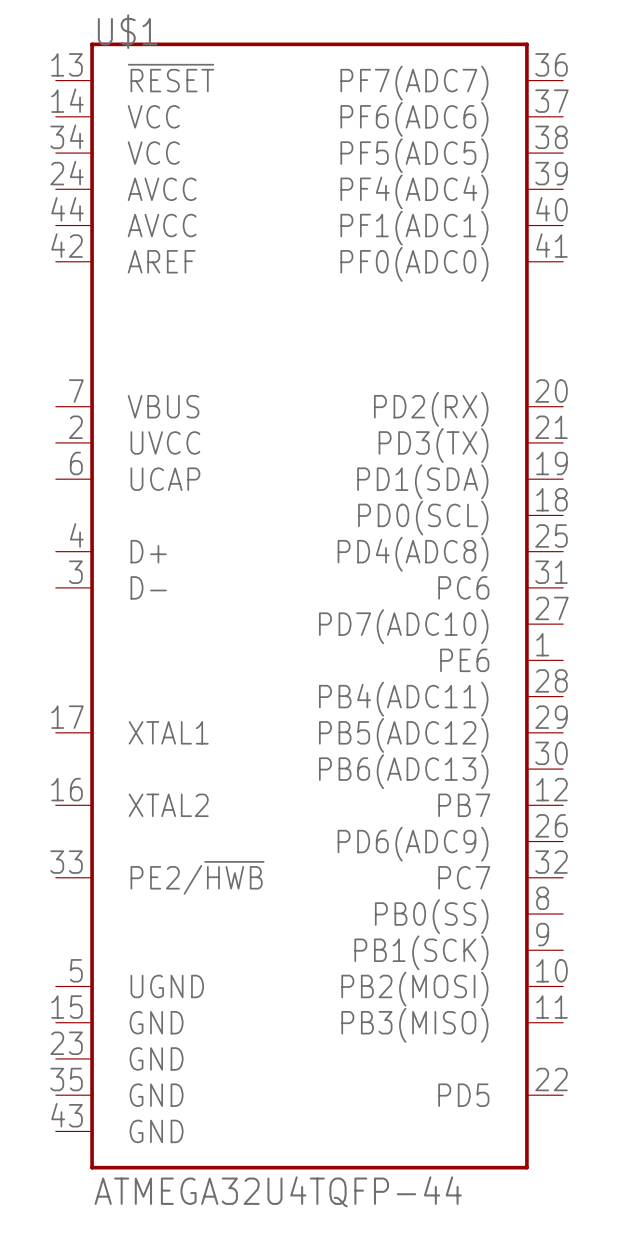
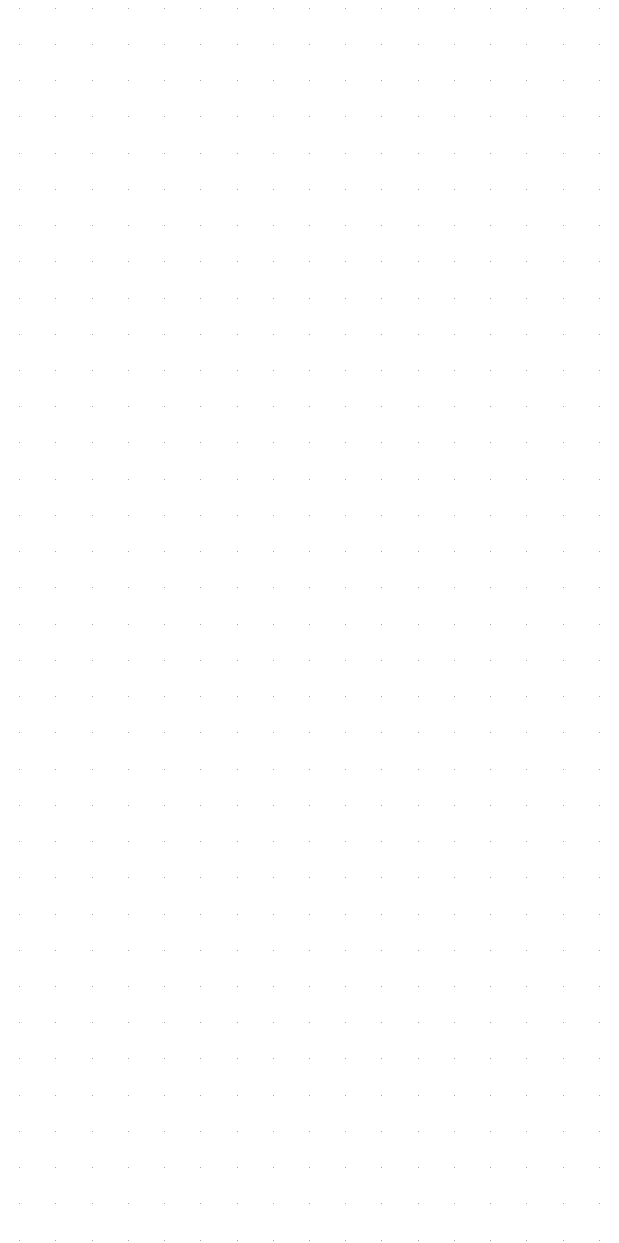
U$1: ATMEGA32U4TQFP-44 (309, 606) -> none

